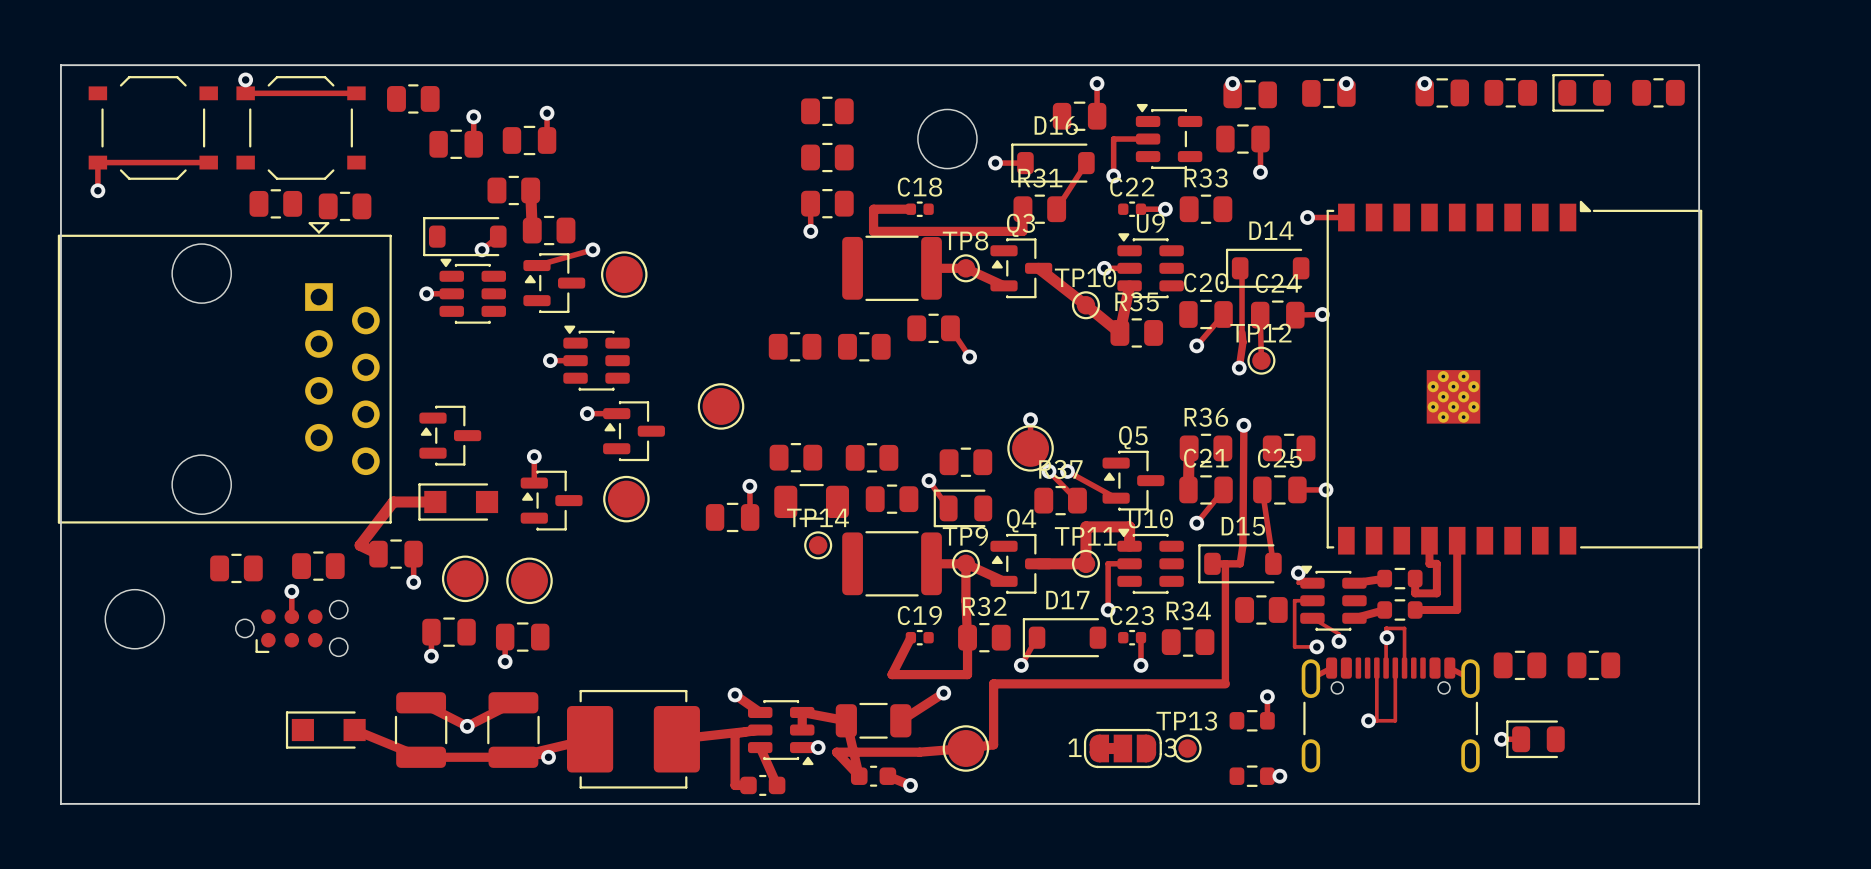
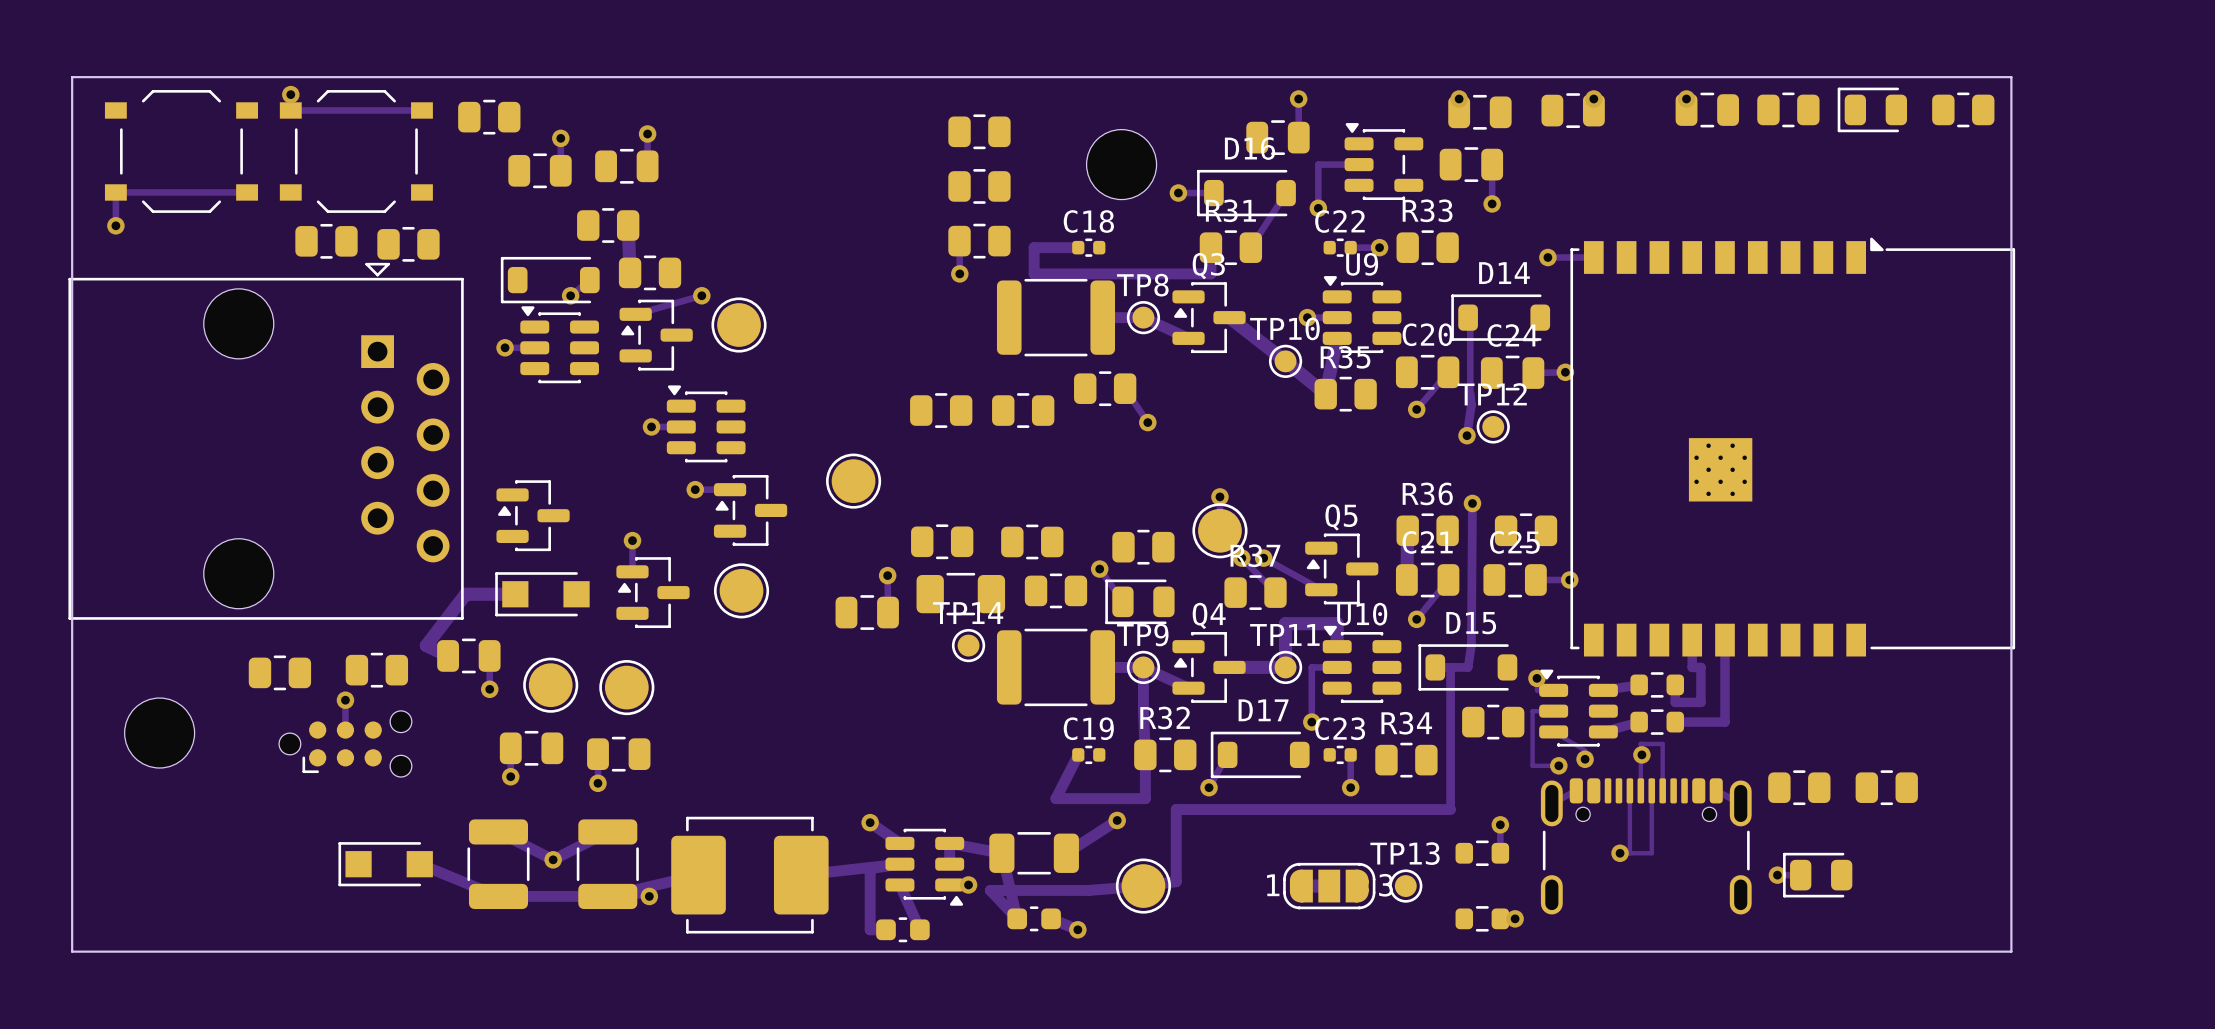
track: (1260, 315) (1261, 360) -> none
track: (1262, 489) (1273, 563) -> none

